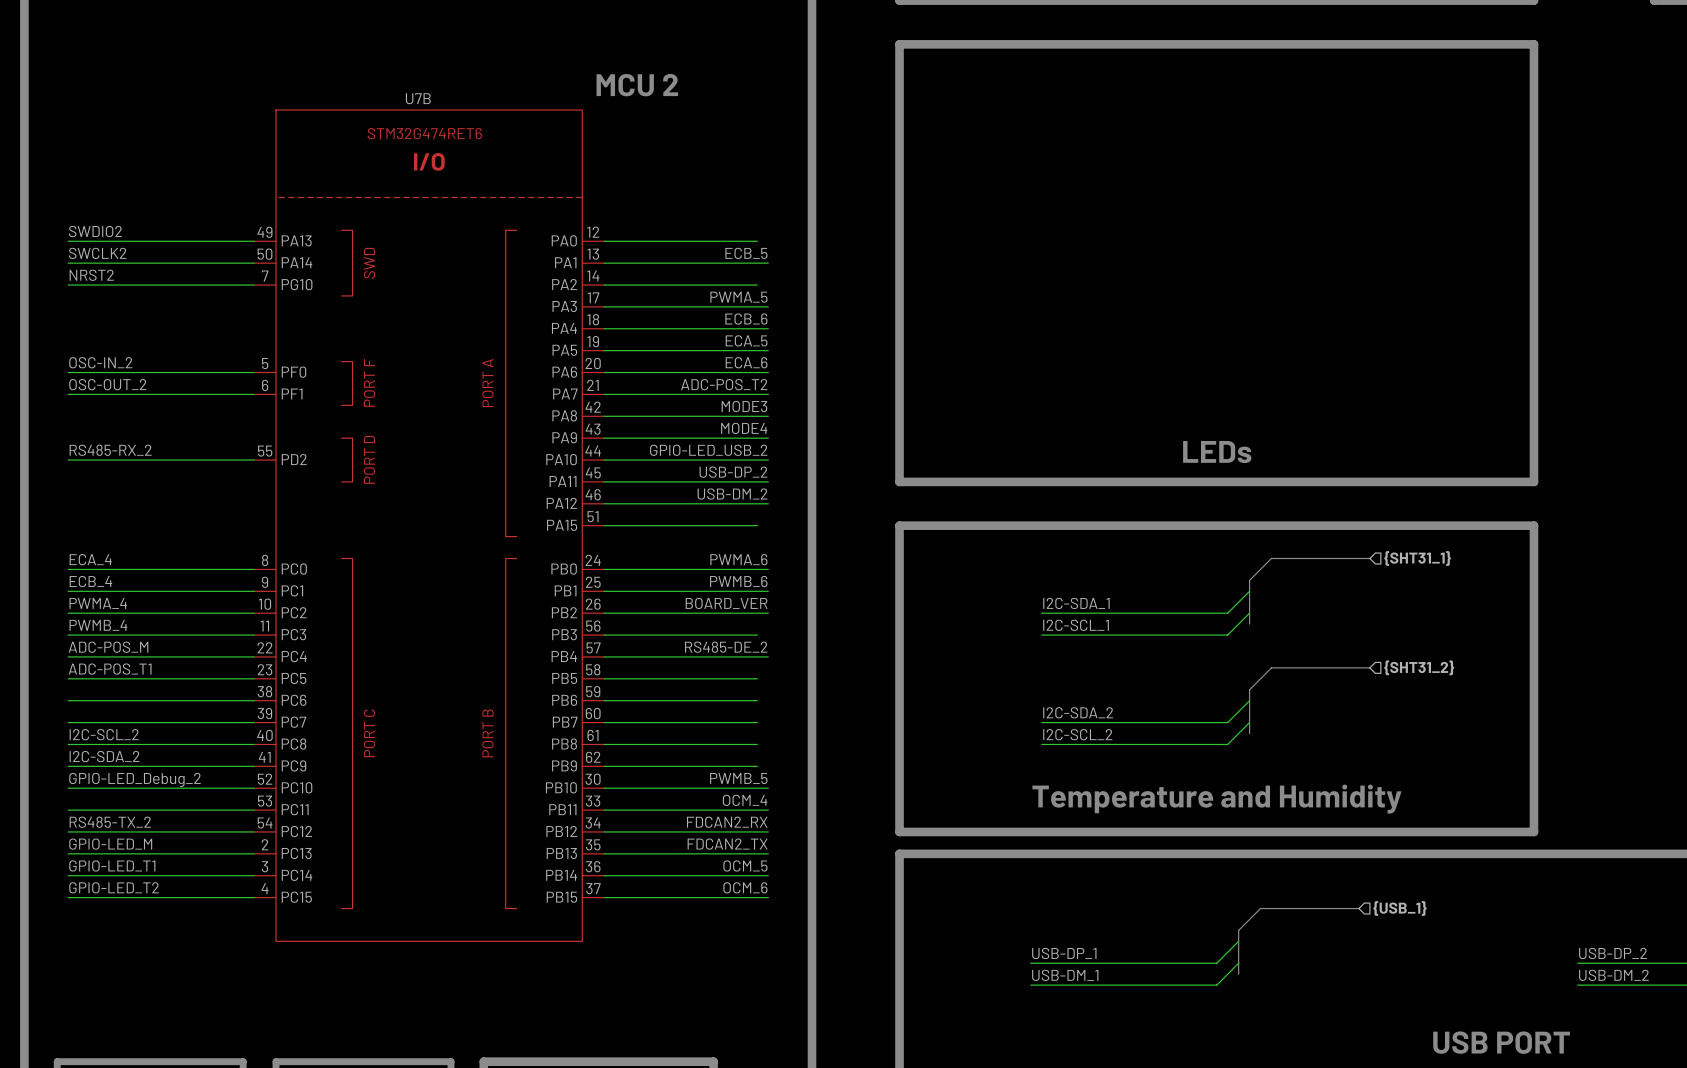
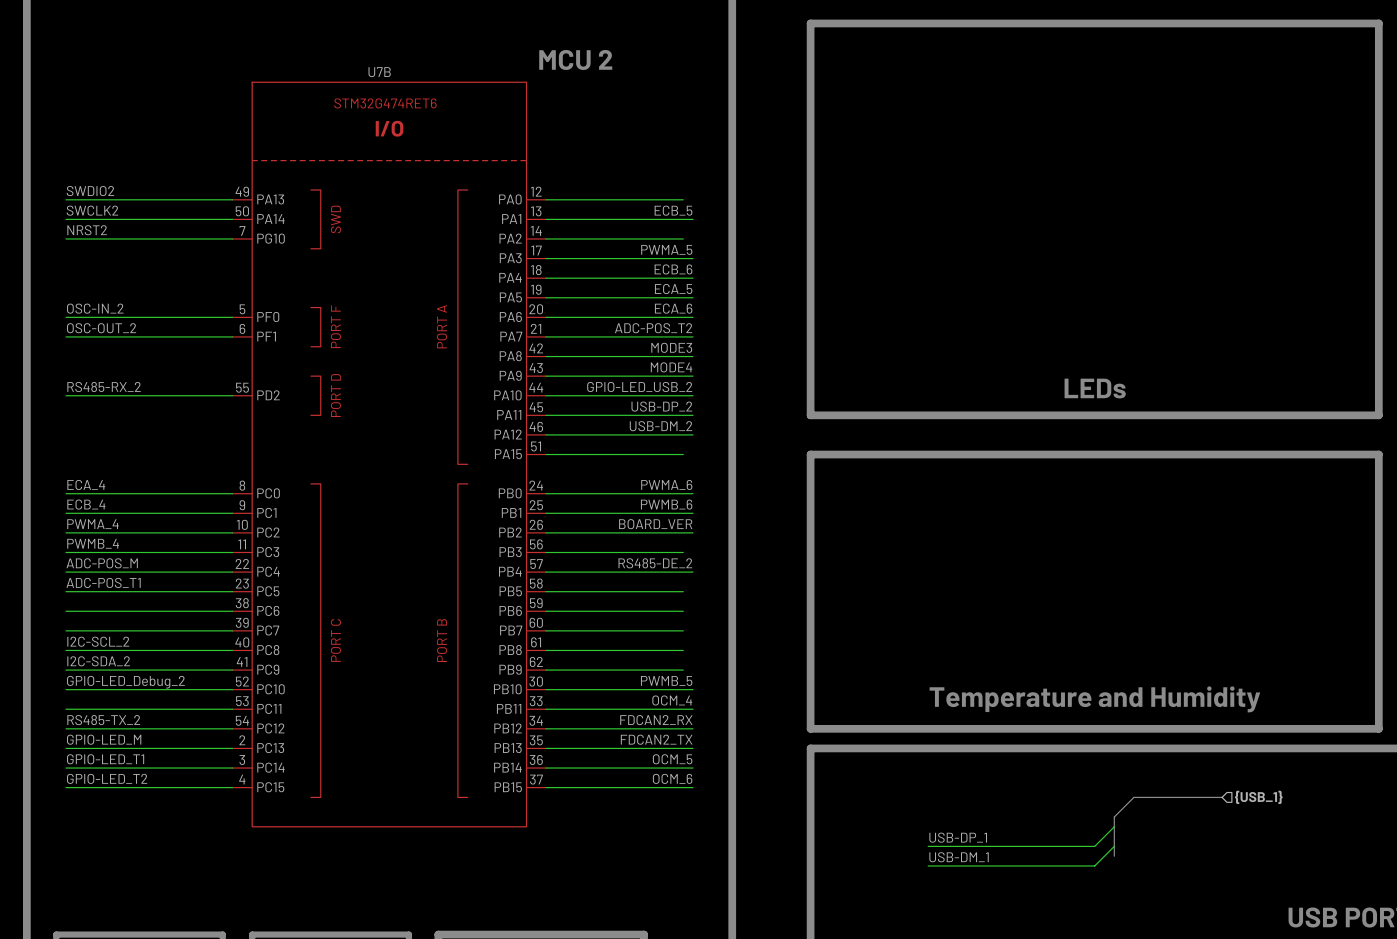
bus: (1369, 558) (1271, 558) (1249, 580) (1249, 624) -> none
hierarchical label: {SHT31_1} (1417, 558) -> none
wire: (1249, 591) (1227, 613) (1041, 613) -> none
label: I2C-SDA_1 (1076, 603) -> none
wire: (1249, 613) (1227, 635) (1041, 635) -> none
label: I2C-SCL_1 (1076, 625) -> none
bus: (1369, 667) (1271, 667) (1249, 689) (1249, 733) -> none
hierarchical label: {SHT31_2} (1419, 667) -> none
wire: (1249, 700) (1227, 722) (1041, 722) -> none
label: I2C-SDA_2 (1078, 712) -> none
wire: (1249, 722) (1227, 744) (1041, 744) -> none
label: I2C-SCL_2 (1077, 734) -> none

